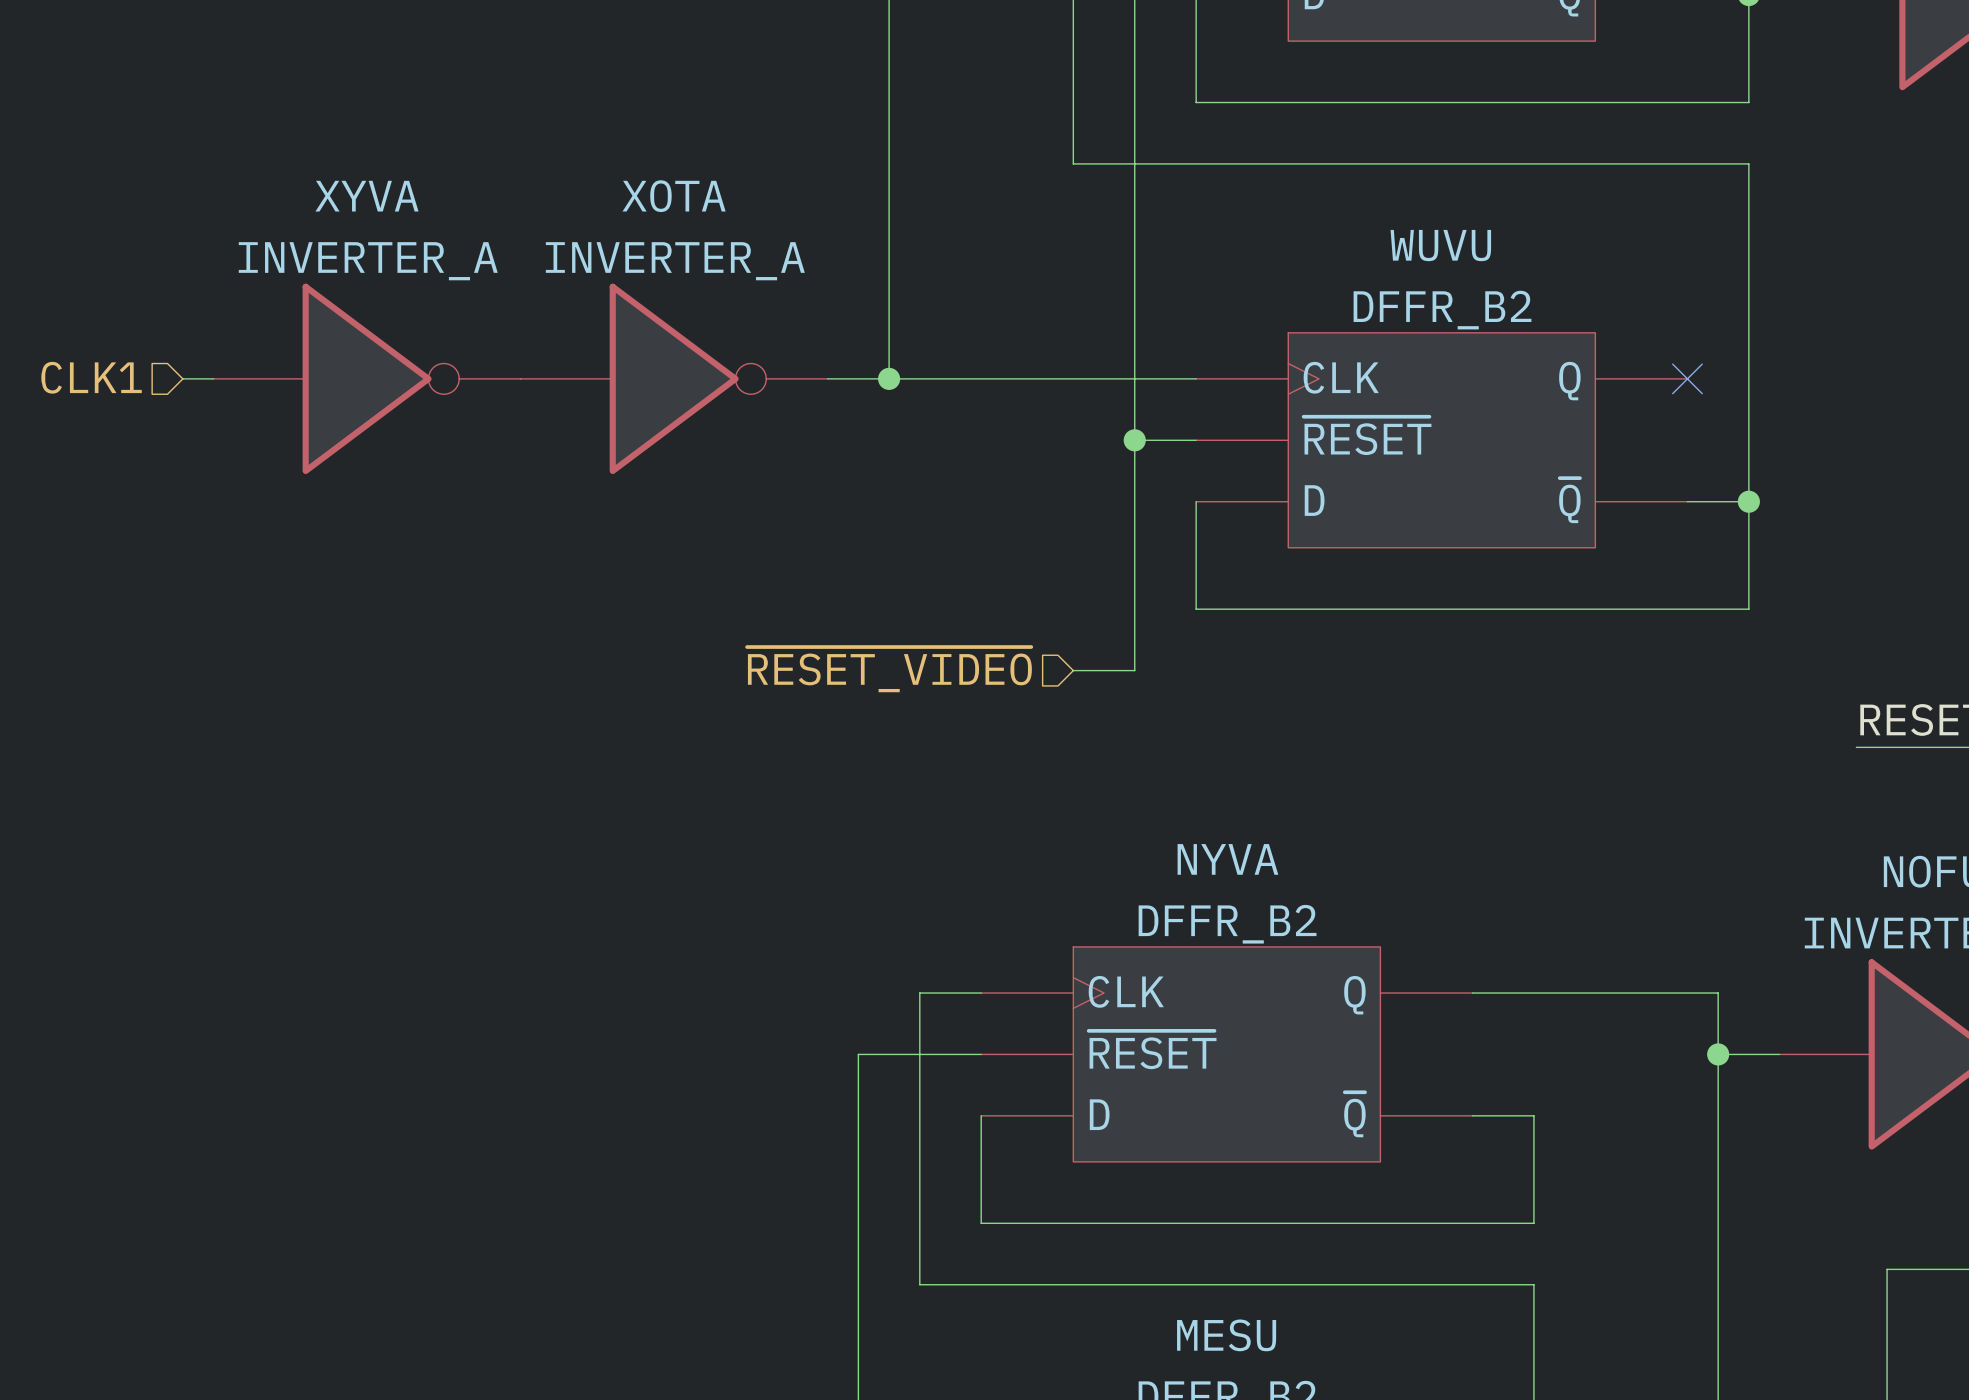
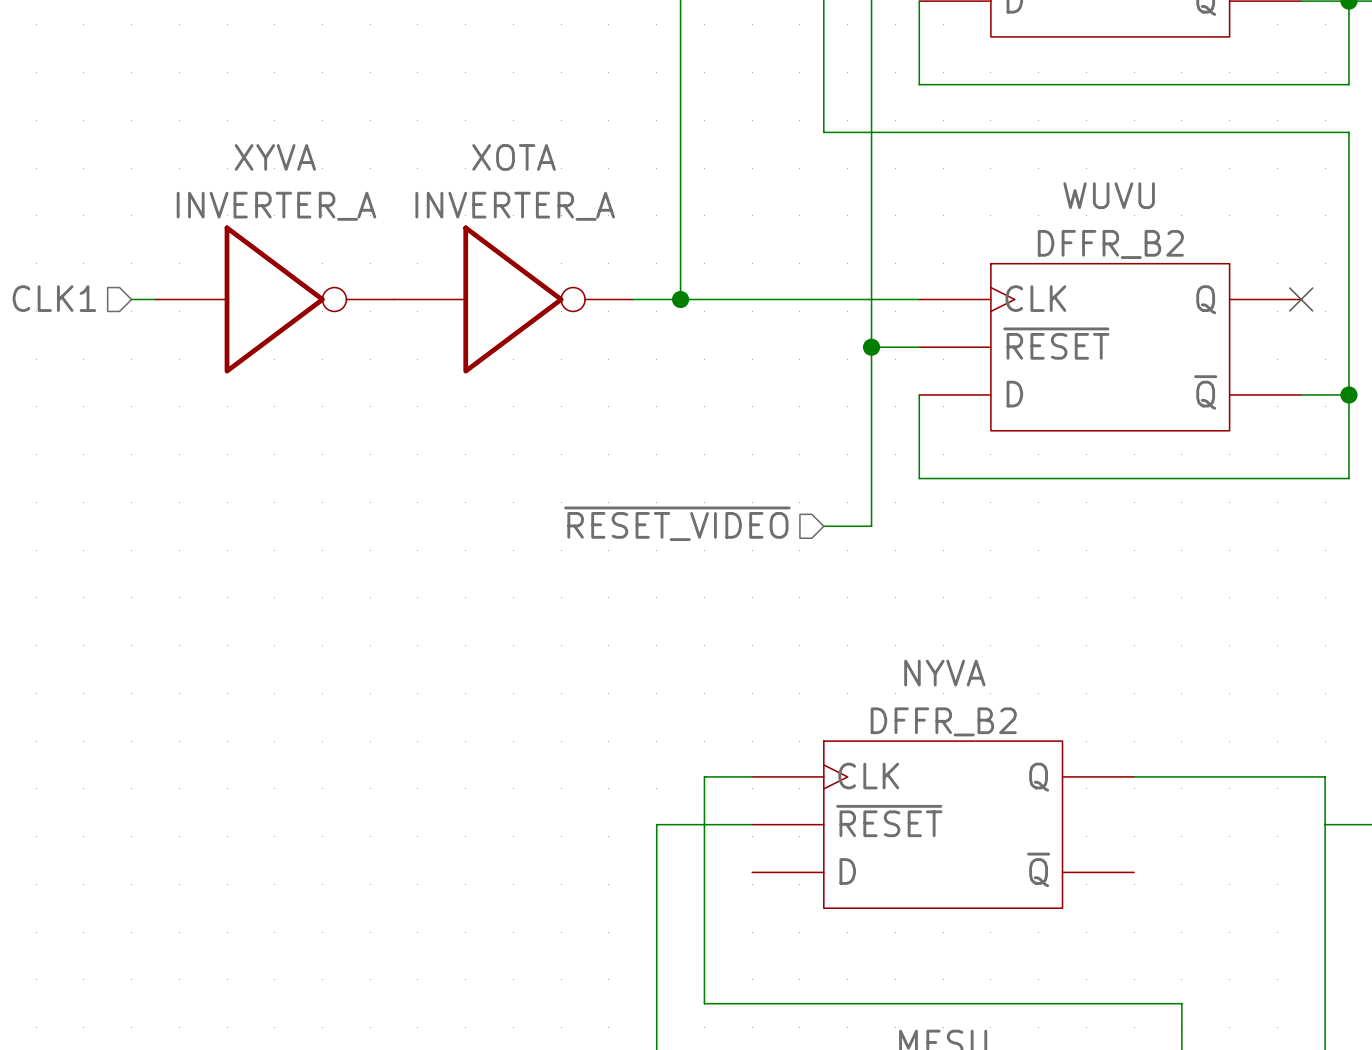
junction: (1718, 1054) -> none
wire: (981, 1115) (981, 1223) (1533, 1223) (1533, 1115) (1472, 1115) -> none

